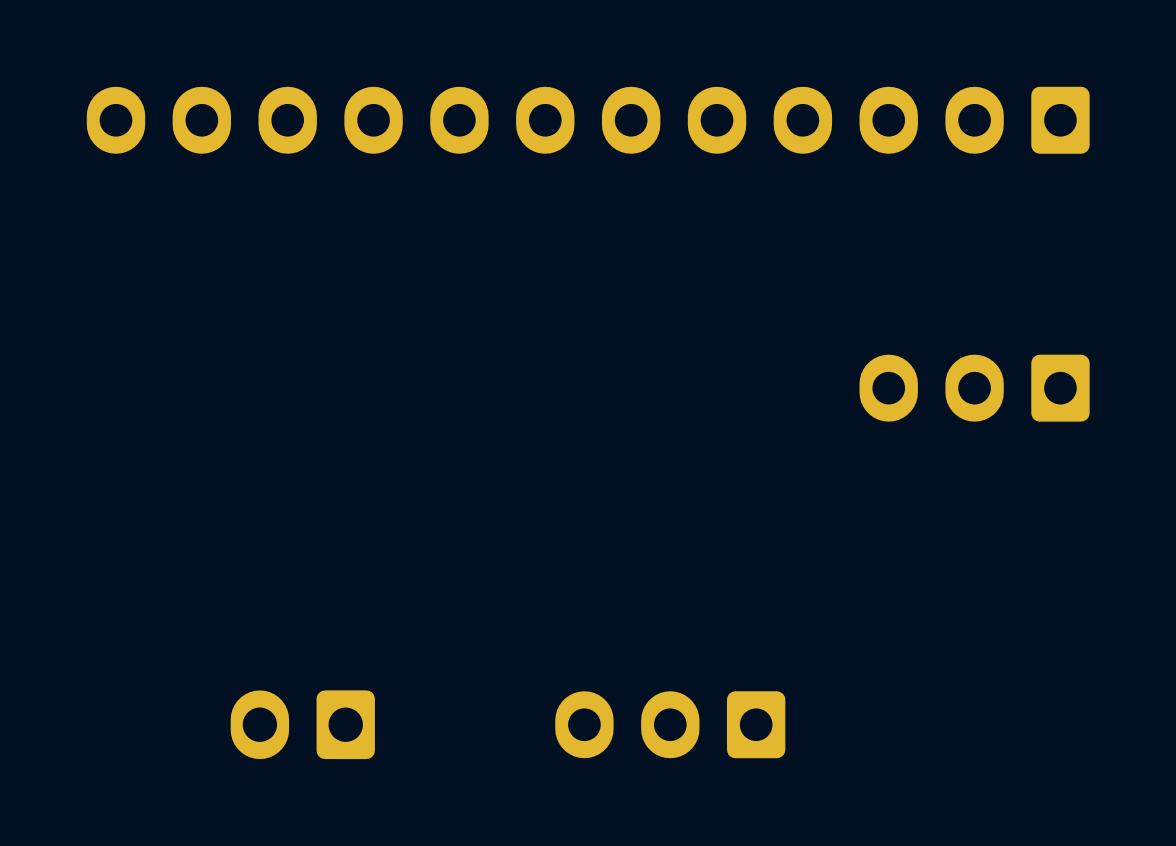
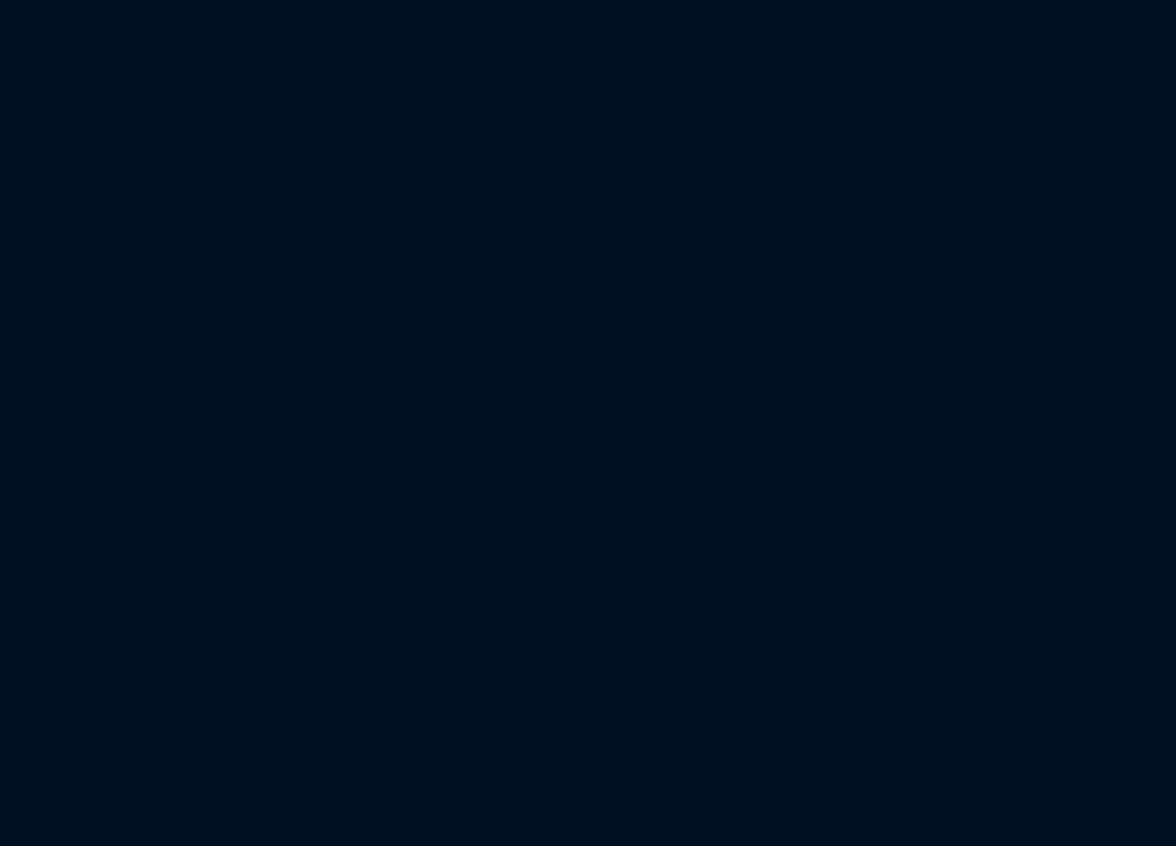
part: (588, 120) -> none
part: (974, 388) -> none
part: (302, 724) -> none
part: (670, 724) -> none

